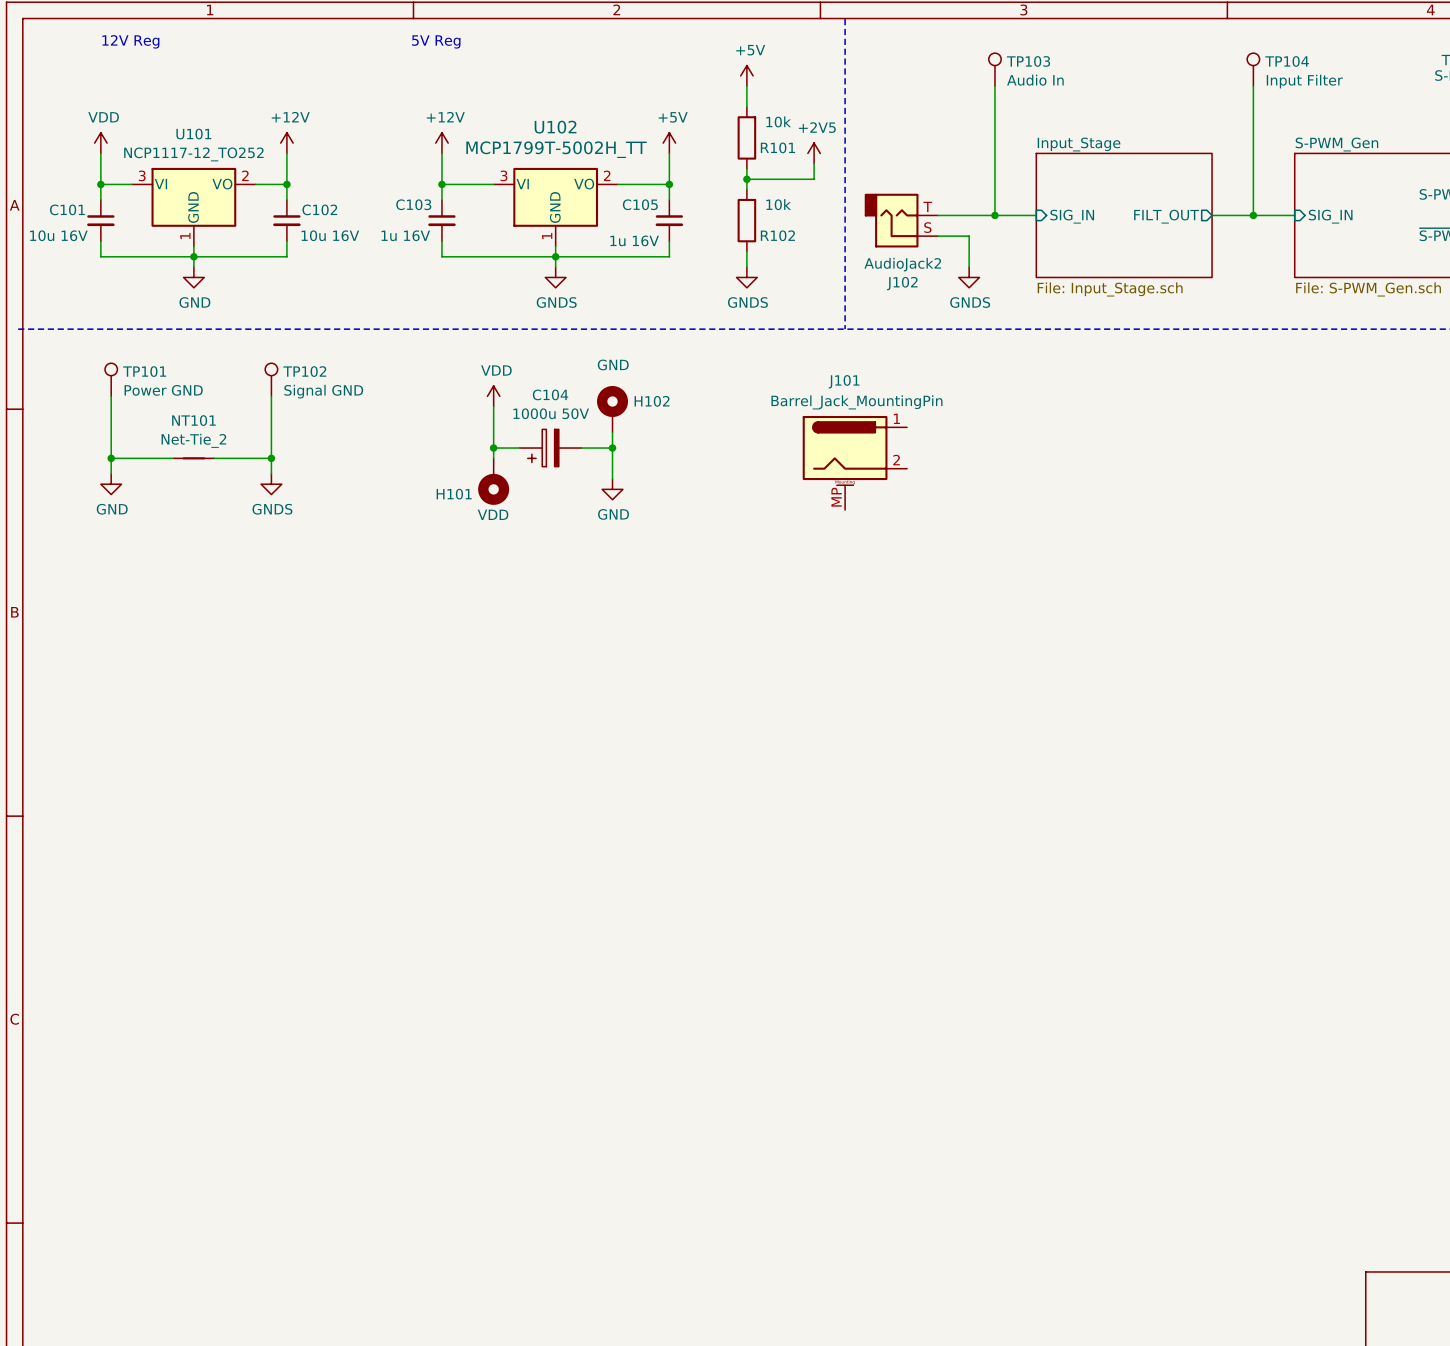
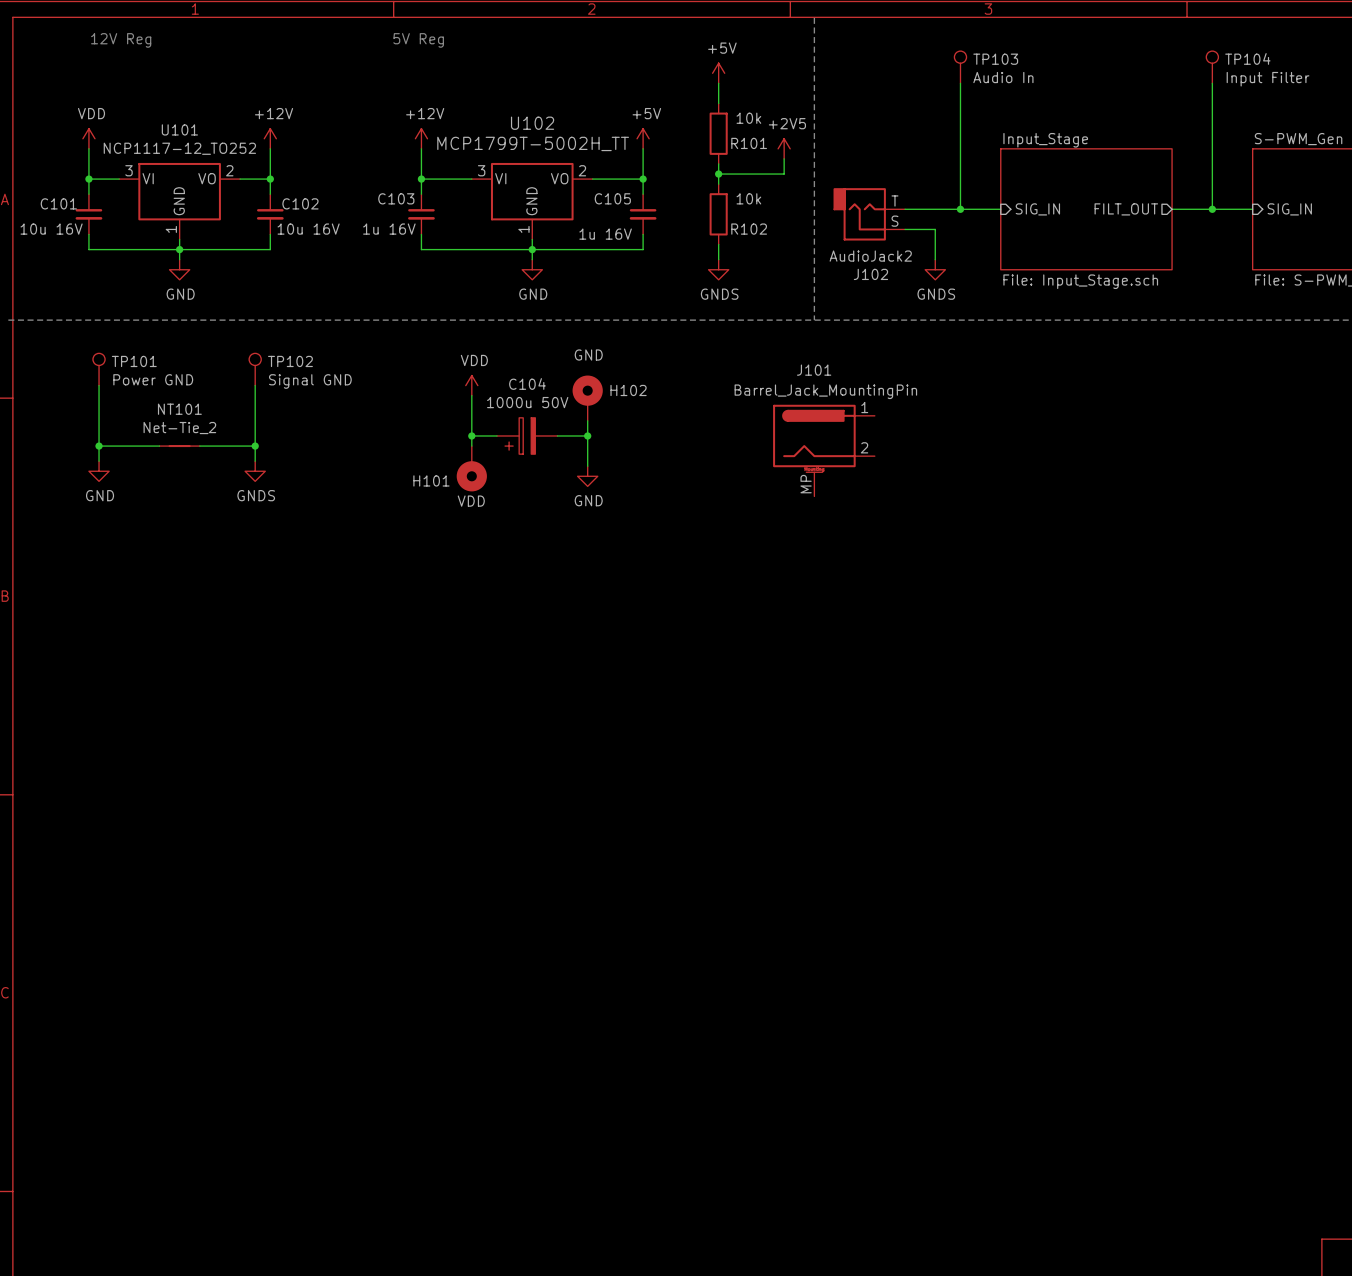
power symbol: GNDS (555, 277) -> GND (532, 269)

